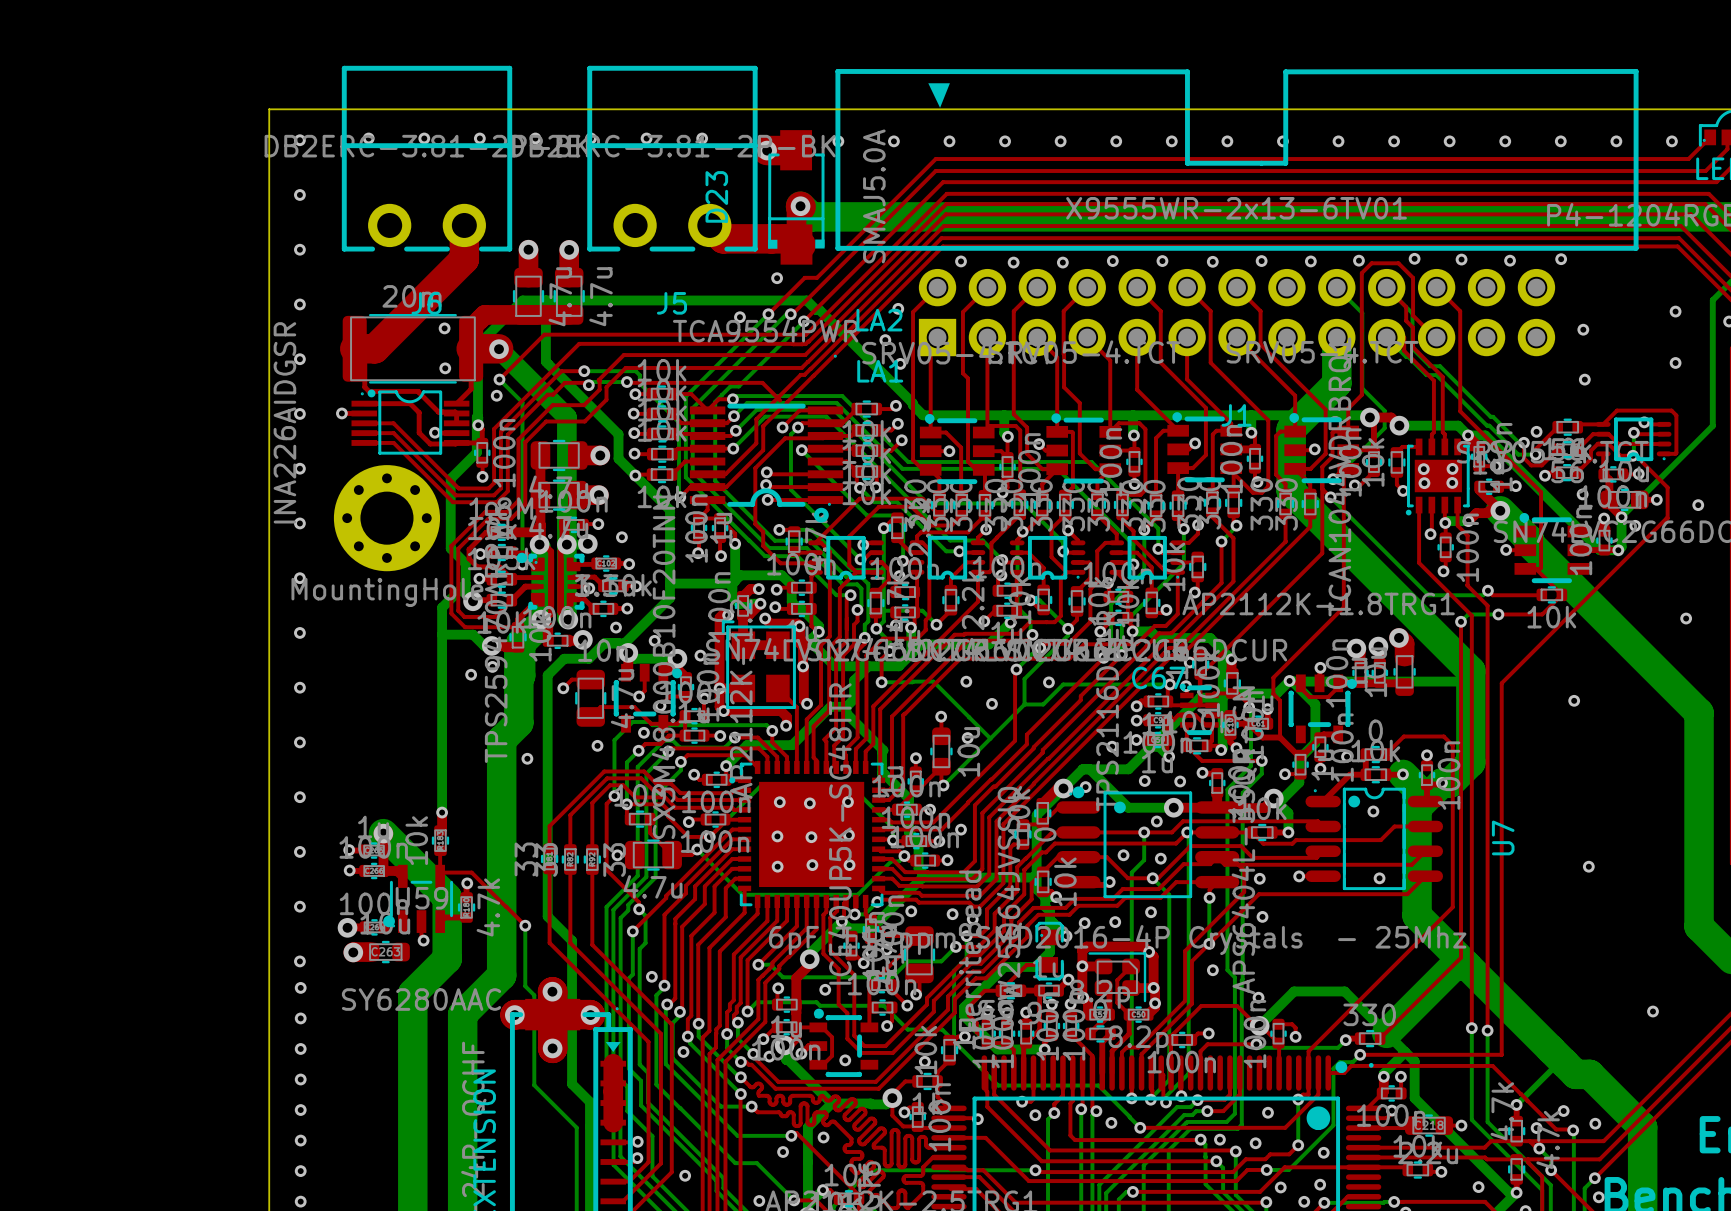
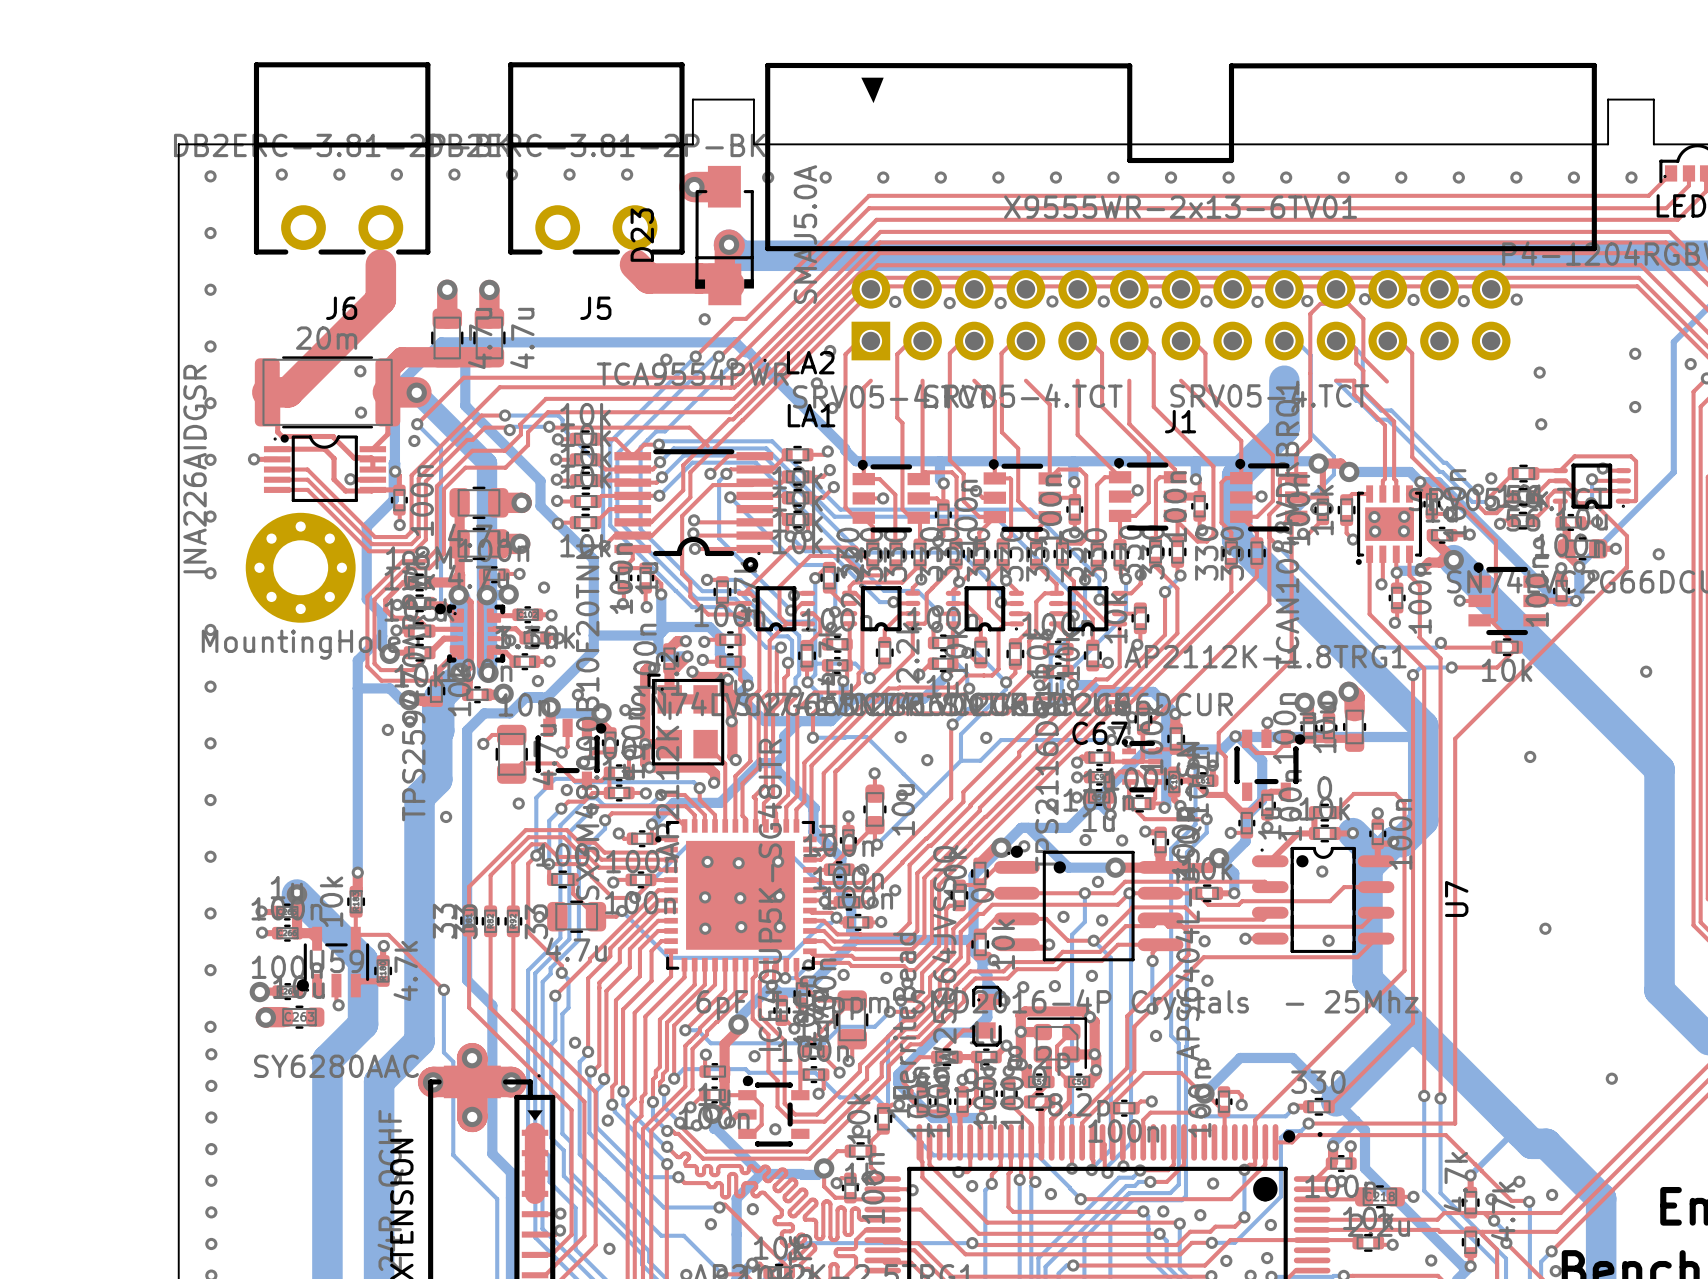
board edge: (765, 109) (824, 109) -> (692, 144) (692, 99) (753, 99) (753, 144)
board edge: (1649, 109) (1693, 109) -> (1608, 144) (1608, 99) (1653, 99) (1653, 144)
J6 position: (427, 158) -> (342, 158)
J5 position: (672, 158) -> (596, 158)
J1 position: (1236, 213) -> (1180, 212)

